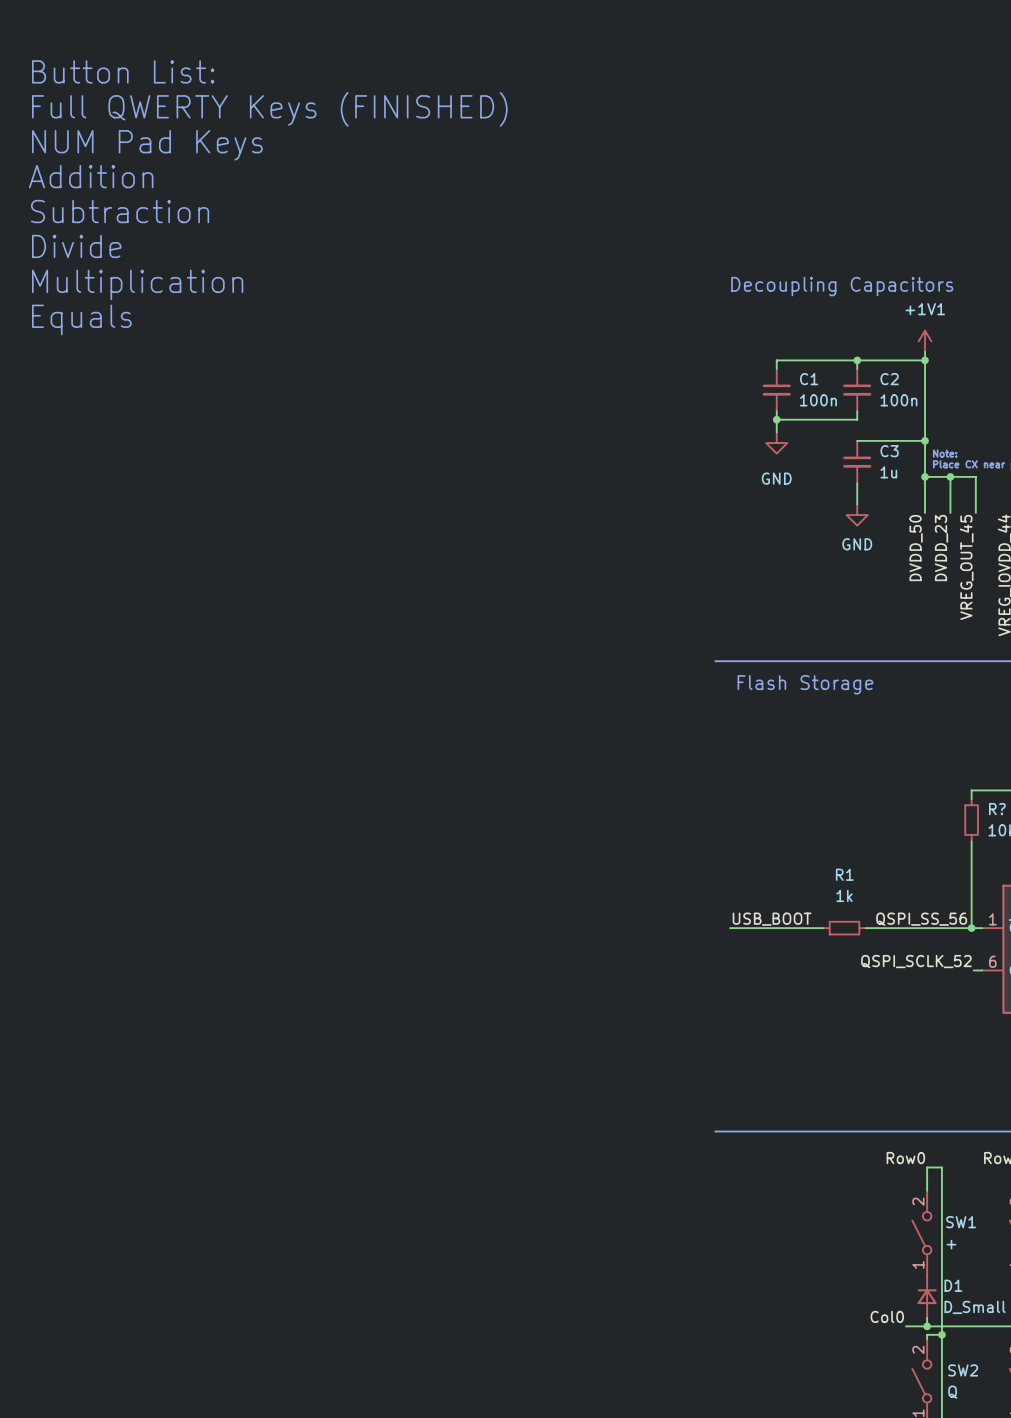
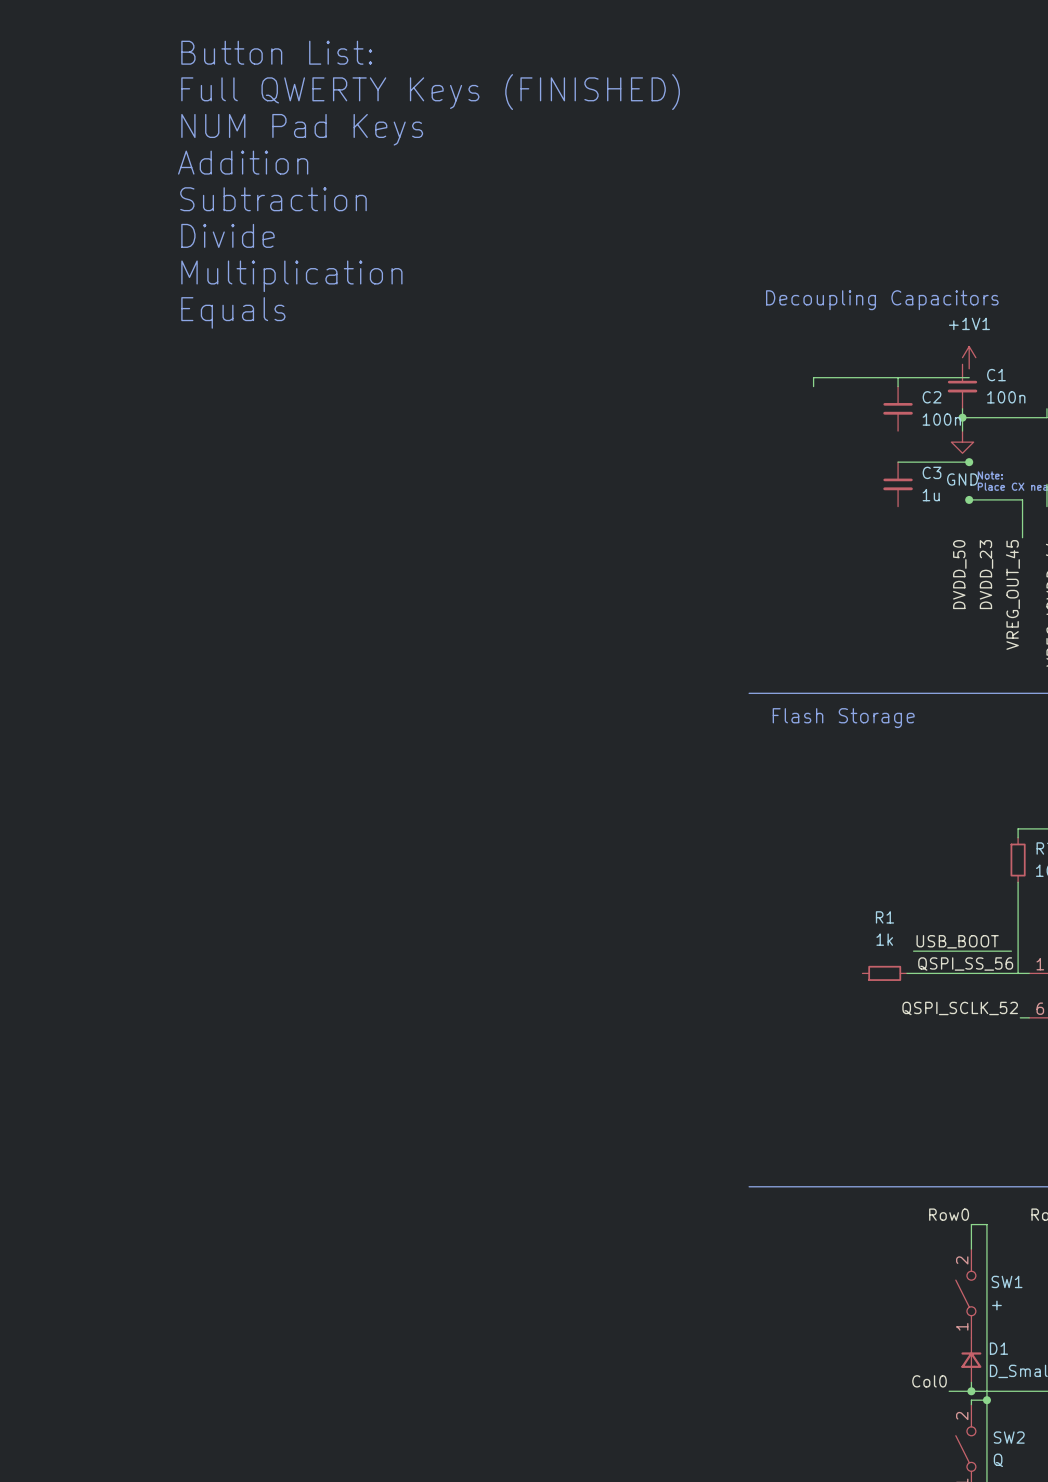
text position: Button List: (123, 71) -> Button List: (276, 52)
text position: Full QWERTY Keys (FINISHED) (269, 109) -> Full QWERTY Keys (FINISHED) (430, 92)
text position: NUM Pad Keys (147, 145) -> NUM Pad Keys (302, 129)
text position: Addition (91, 176) -> Addition (243, 162)
text position: Subtraction (120, 211) -> Subtraction (273, 199)
text position: Divide (76, 246) -> Divide (227, 235)
text position: Multiplication (137, 284) -> Multiplication (291, 276)
text position: Equals (81, 319) -> Equals (233, 312)
wire: (925, 351) (925, 512) -> none
junction: (857, 360) -> none
junction: (925, 360) -> none
C1 position: (776, 390) -> (962, 386)
junction: none -> (962, 417)
wire: (776, 411) (776, 432) -> (962, 408) (962, 431)
wire: (857, 411) (857, 419) (776, 419) -> (1046, 408) (1046, 417) (962, 417)
junction: (776, 419) -> none
power symbol: none -> GND (962, 442)
power symbol: GND (776, 443) -> none
wire: (950, 476) (950, 512) -> none
junction: (950, 476) -> none
wire: (857, 483) (857, 504) -> (1046, 484) (1046, 506)
power symbol: GND (857, 515) -> none
label position: USB_BOOT (772, 919) -> USB_BOOT (957, 941)
wire: (730, 928) (823, 928) -> (913, 951) (1011, 951)
junction: (971, 928) -> none

